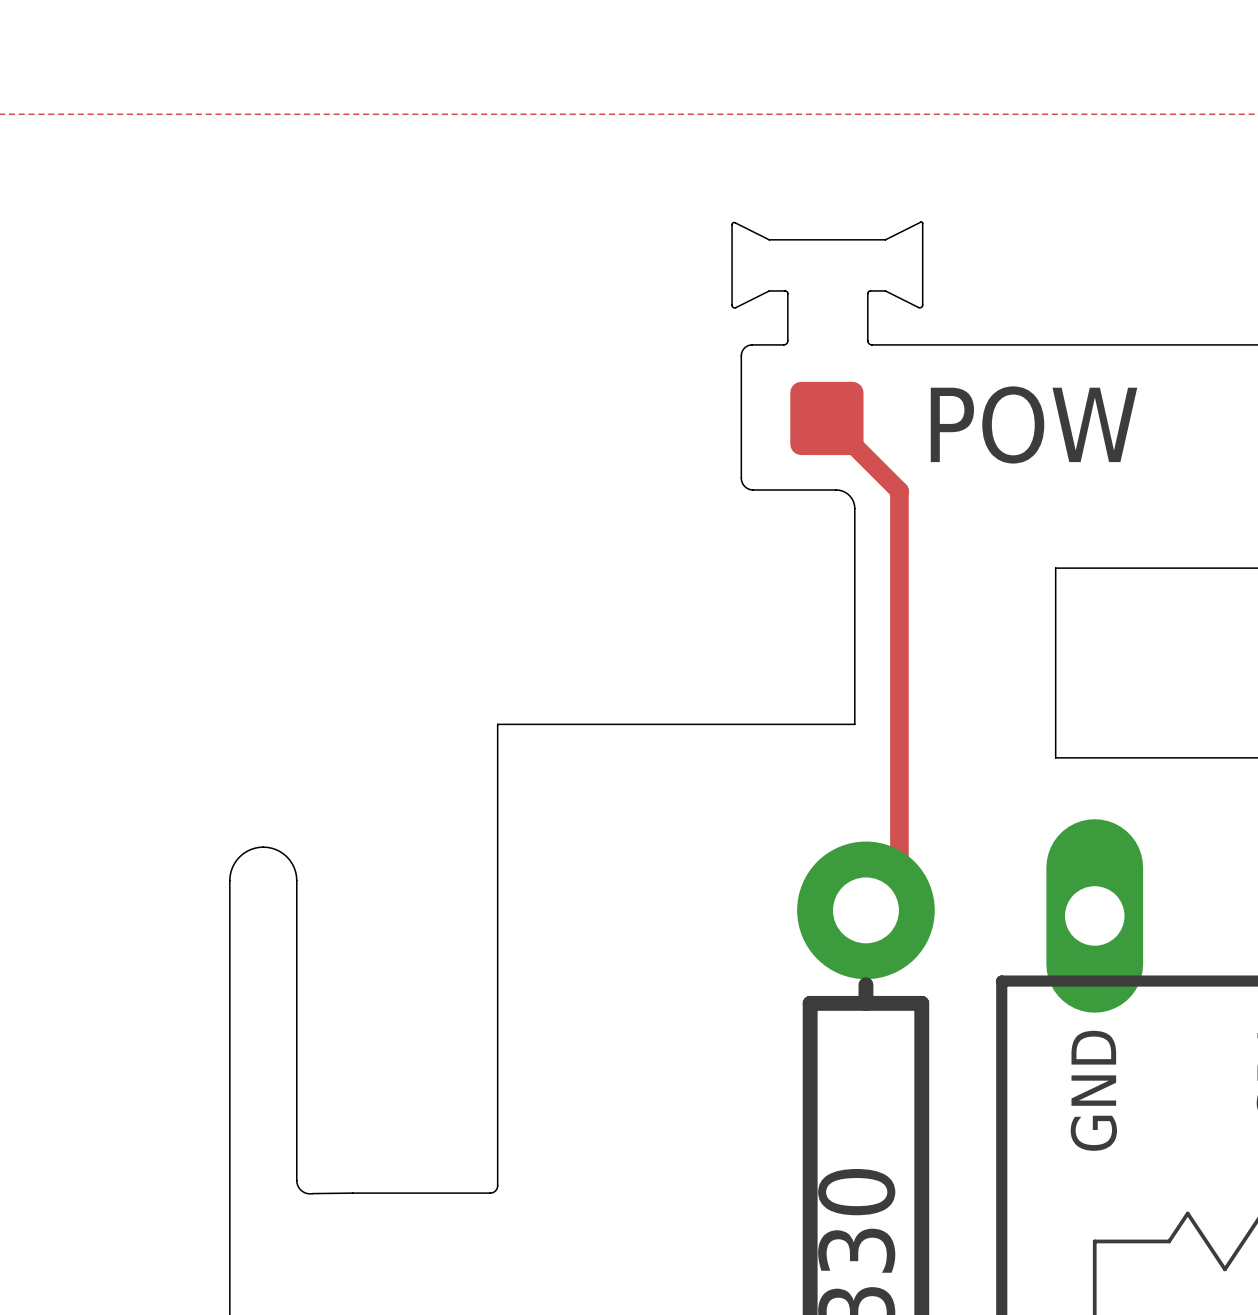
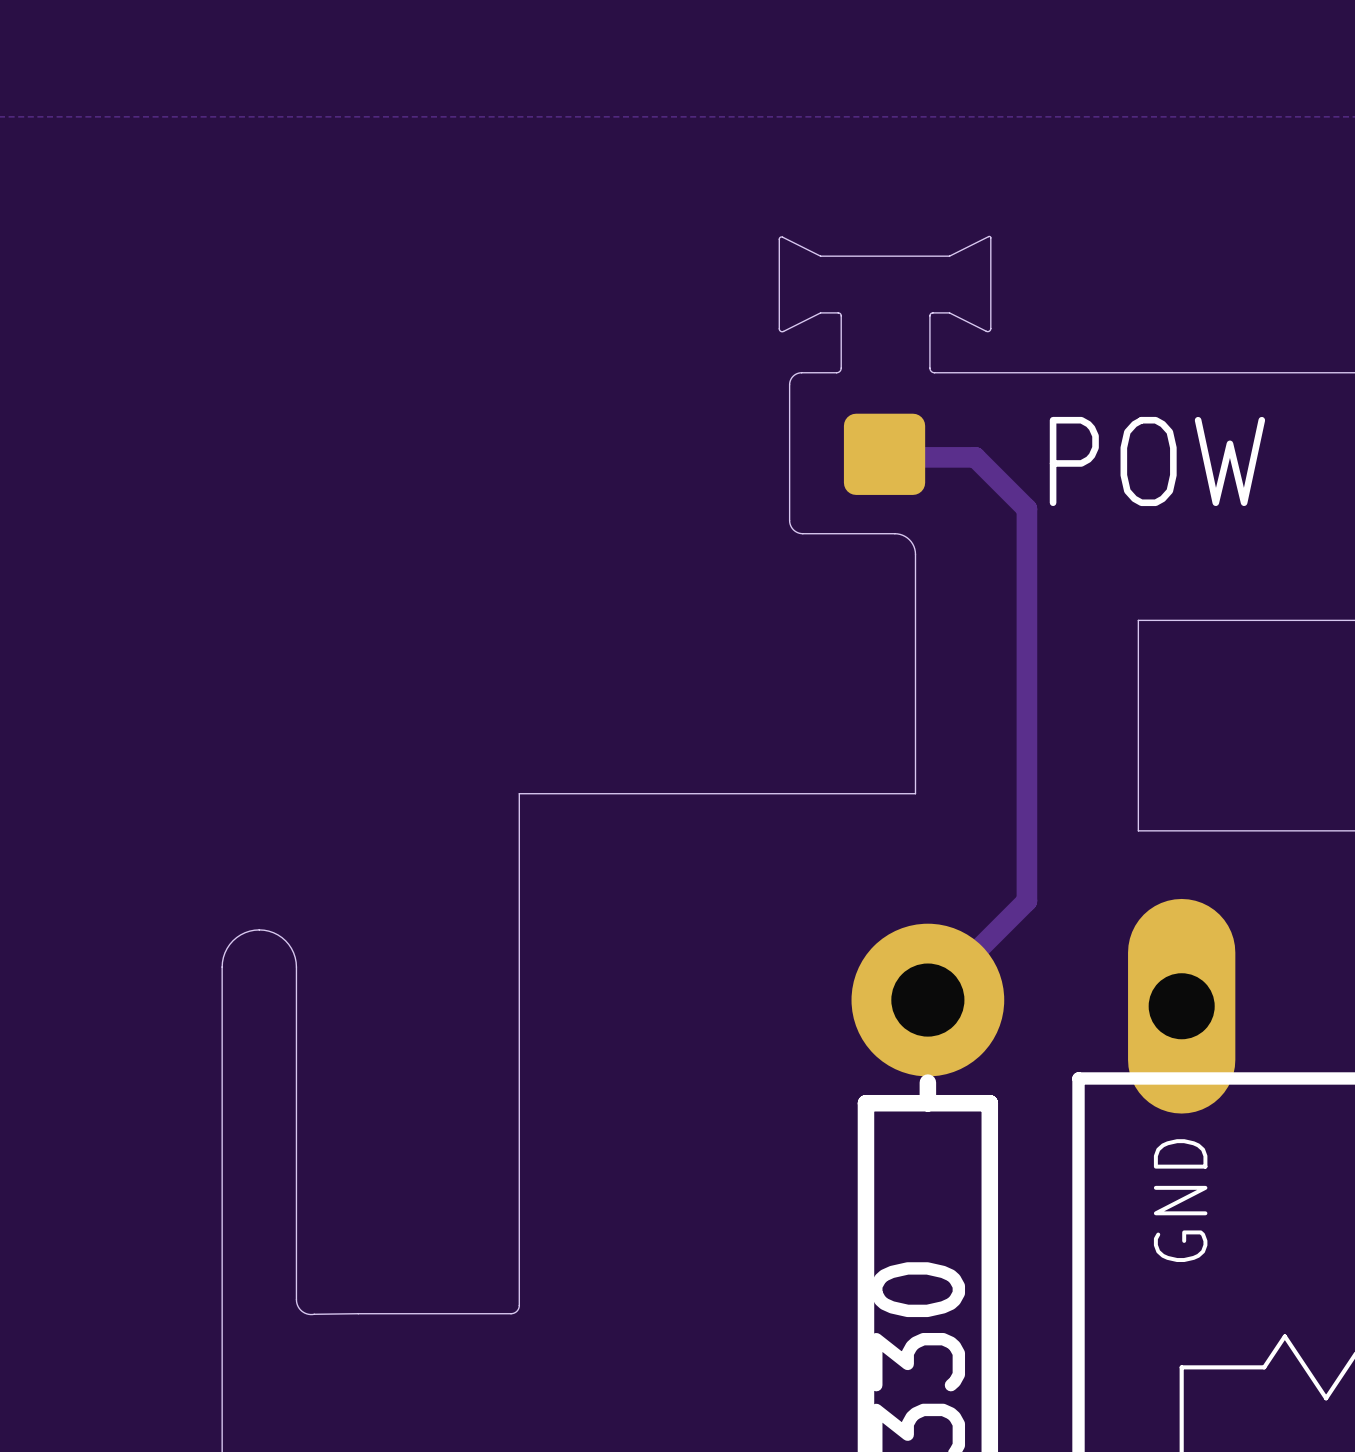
track: (829, 421) (899, 490) (899, 876) -> (887, 457) (975, 457) (1026, 508) (1026, 901) (965, 962)
text position: POW (1034, 424) -> POW (1157, 461)

